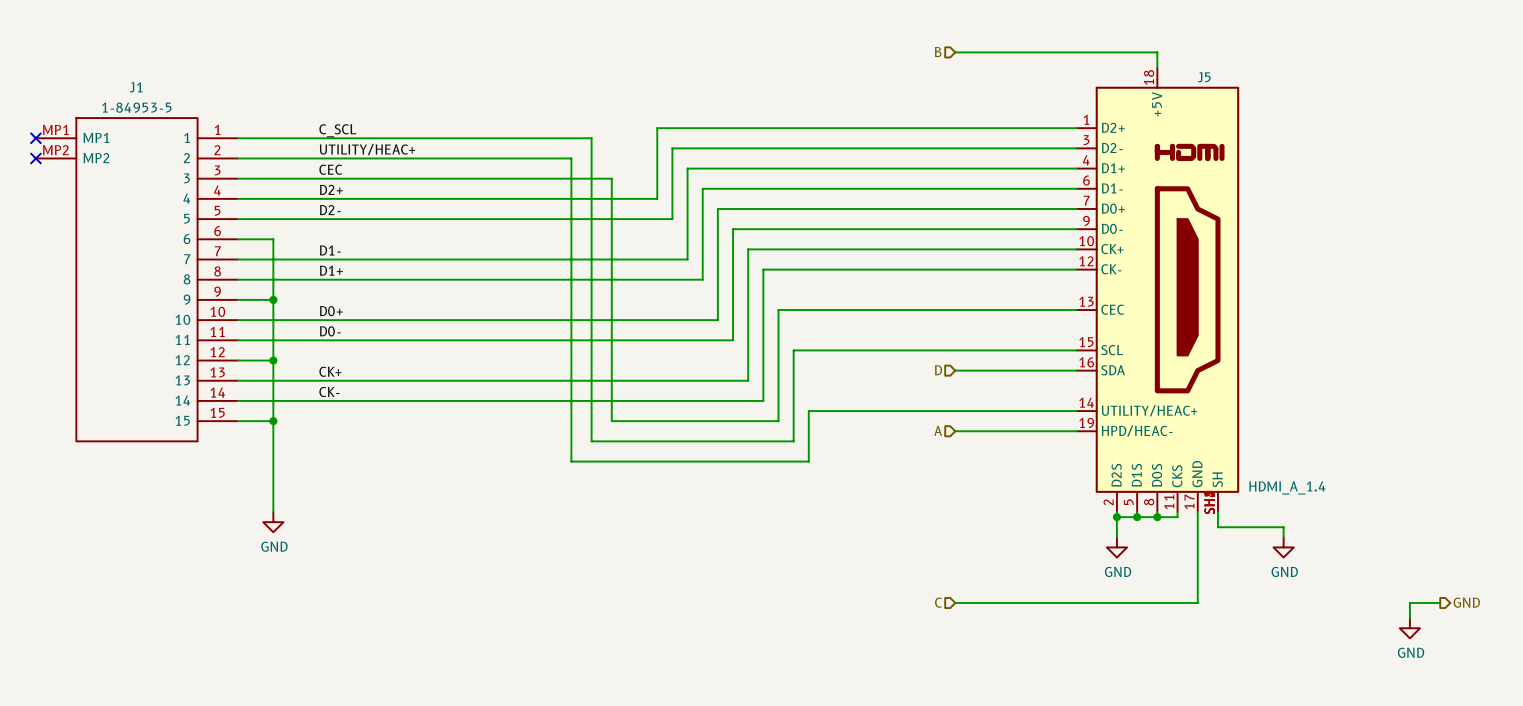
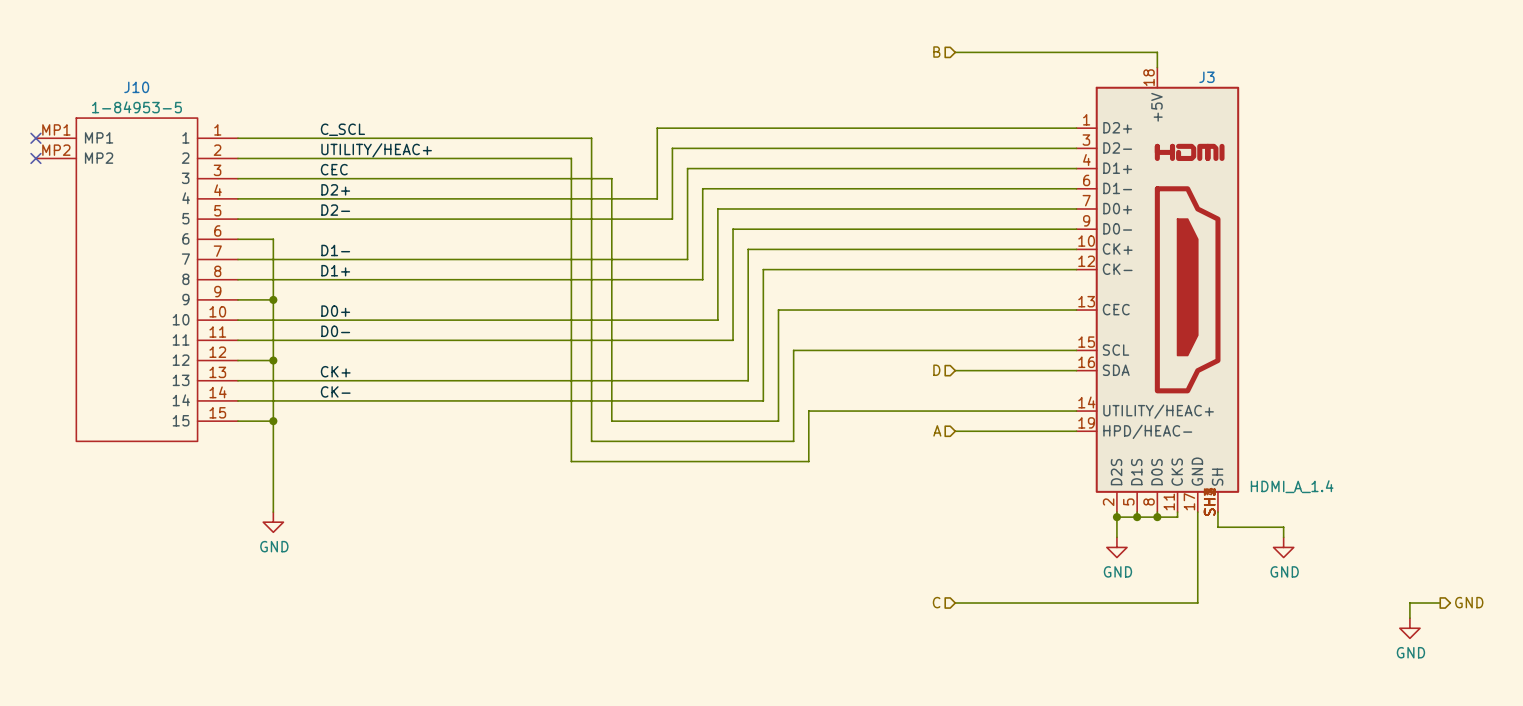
J5 name: J5 (1204, 77) -> J3 (1206, 77)
J1 name: J1 (136, 87) -> J10 (136, 87)

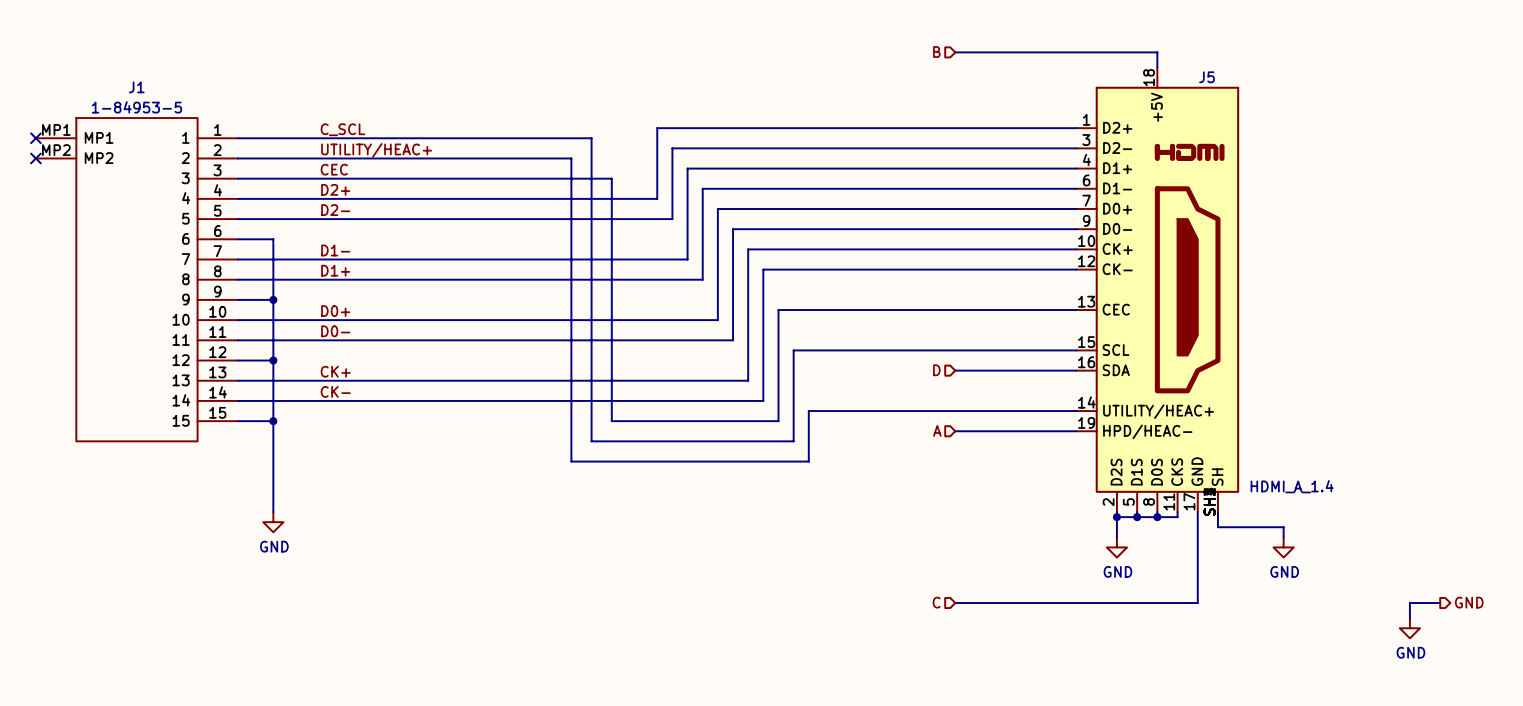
J3 name: J3 (1206, 77) -> J5 (1206, 77)
J10 name: J10 (136, 87) -> J1 (136, 87)

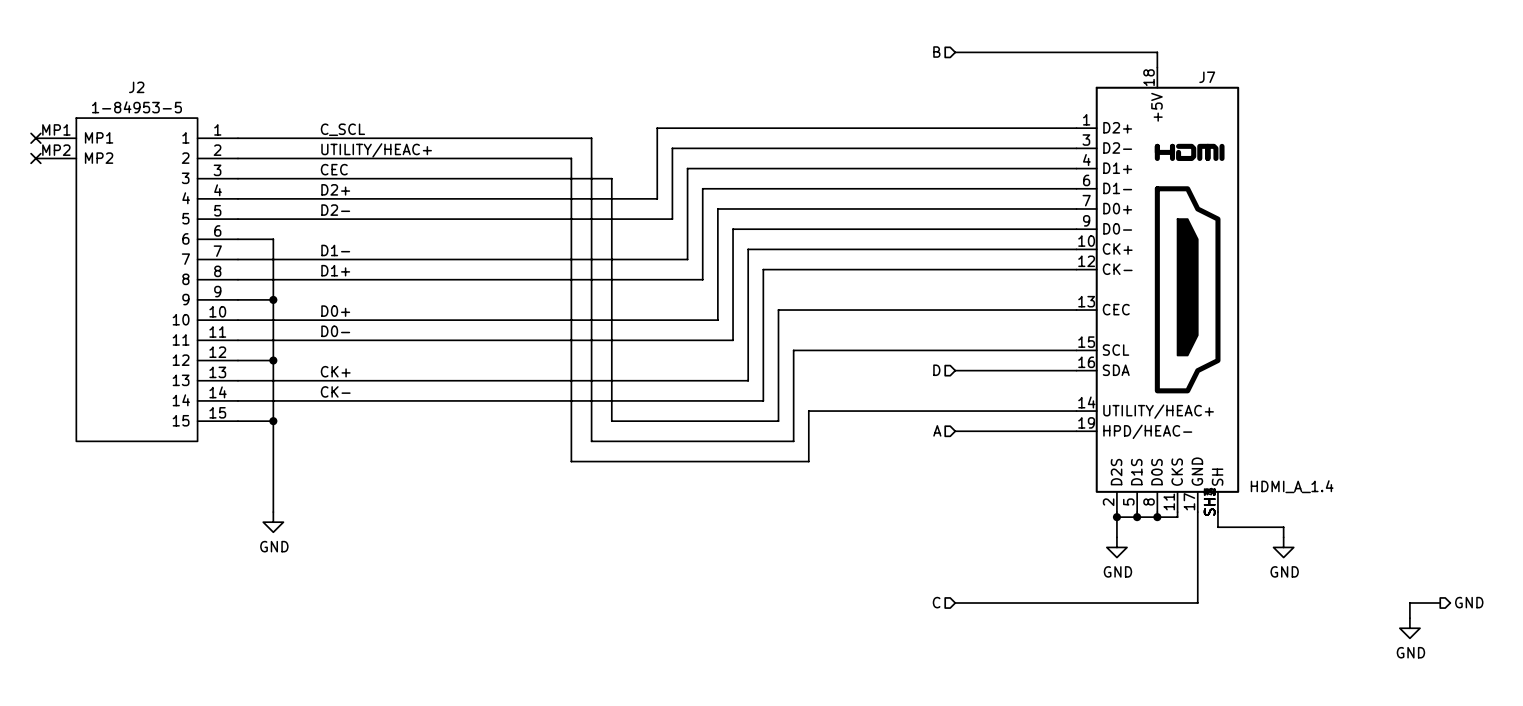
J5 name: J5 (1206, 77) -> J7 (1207, 77)
J1 name: J1 (136, 87) -> J2 (136, 87)

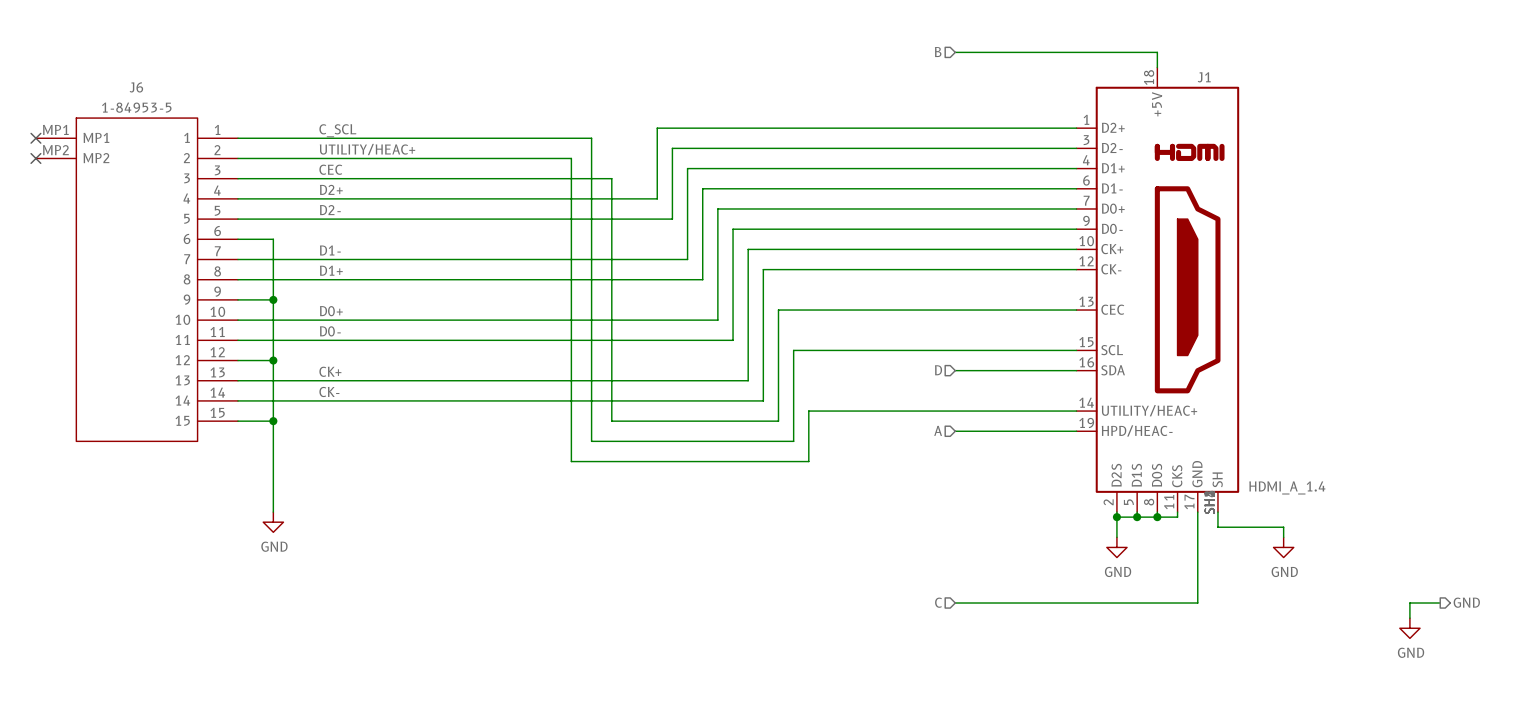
J7 name: J7 (1207, 77) -> J1 (1204, 77)
J2 name: J2 (136, 87) -> J6 (136, 87)

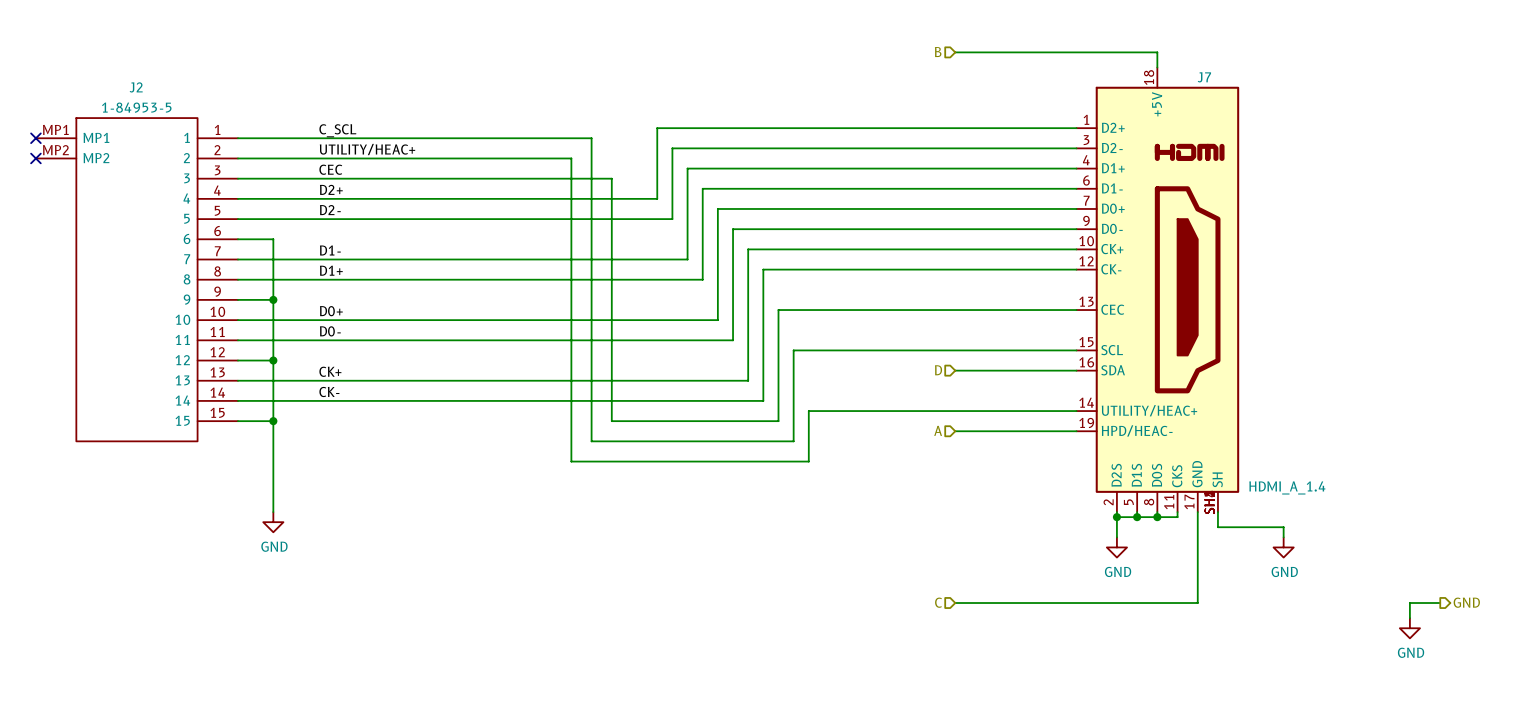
J1 name: J1 (1204, 77) -> J7 (1204, 77)
J6 name: J6 (136, 87) -> J2 (136, 87)

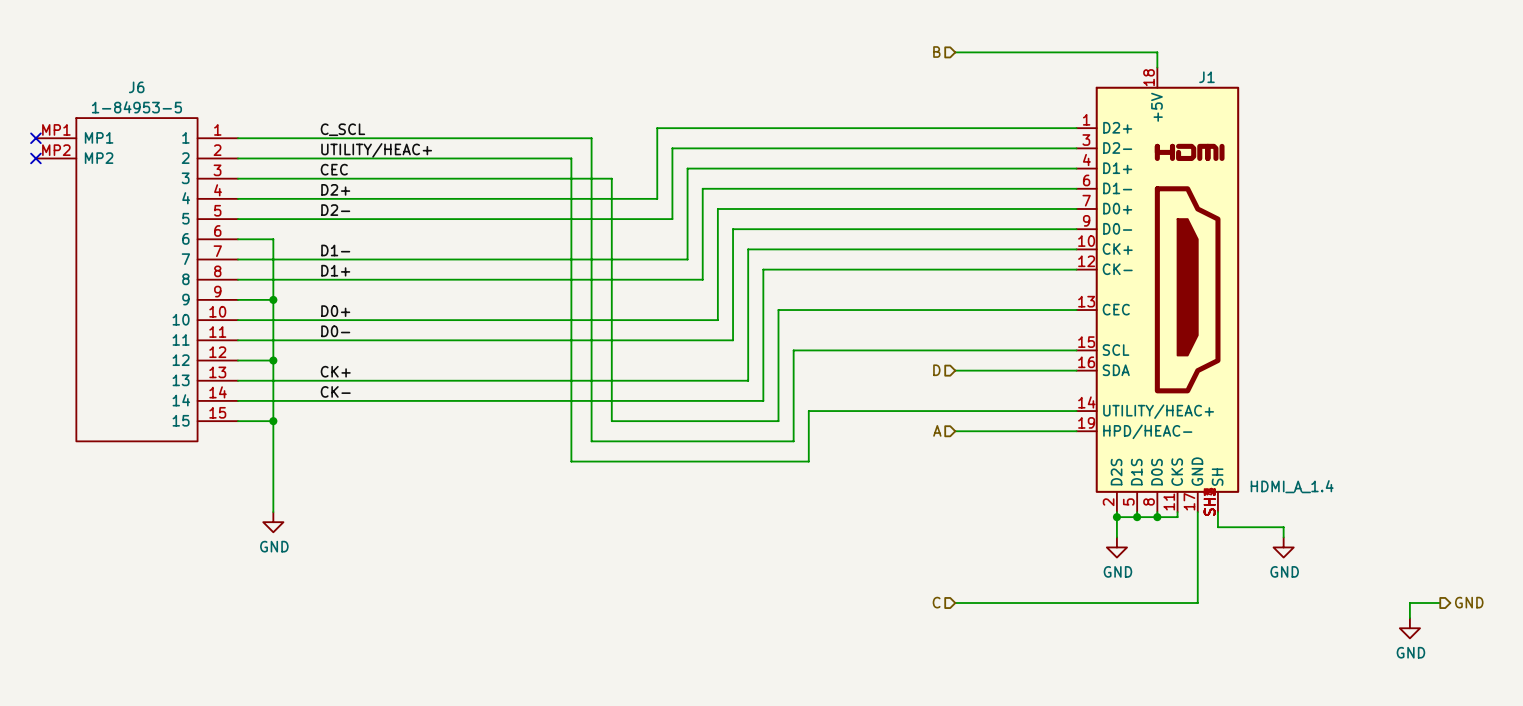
J7 name: J7 (1204, 77) -> J1 (1206, 77)
J2 name: J2 (136, 87) -> J6 (136, 87)

